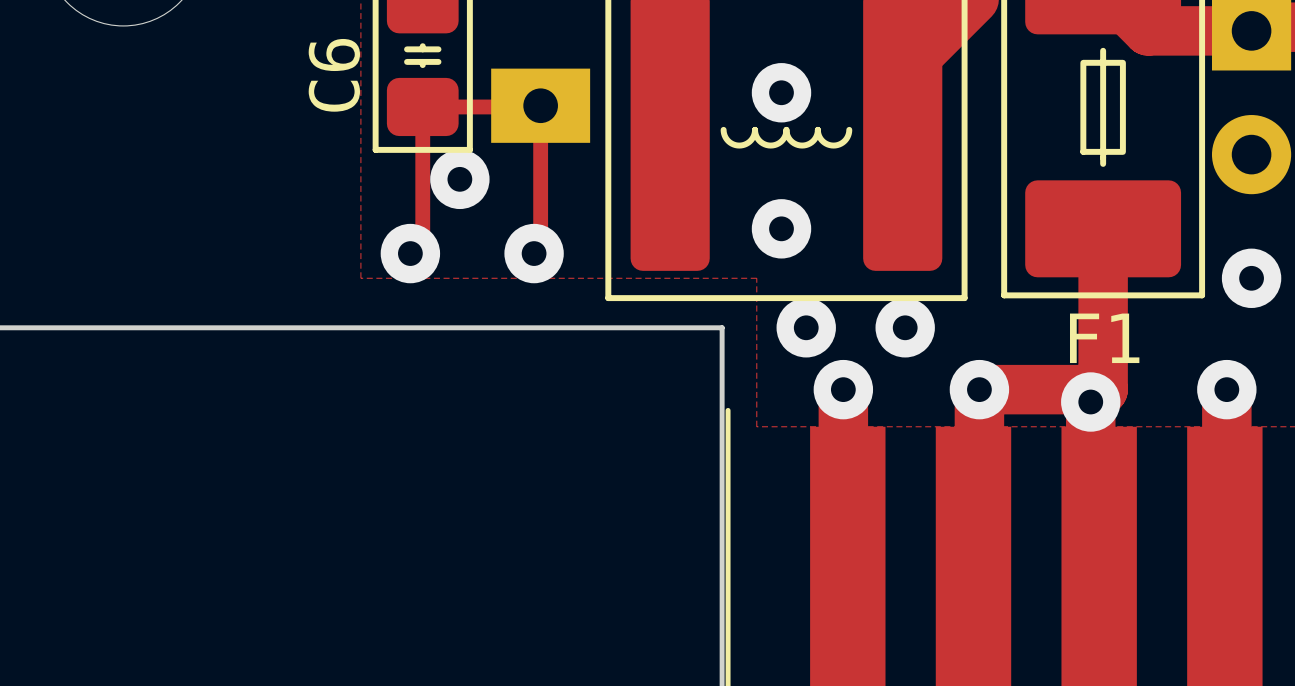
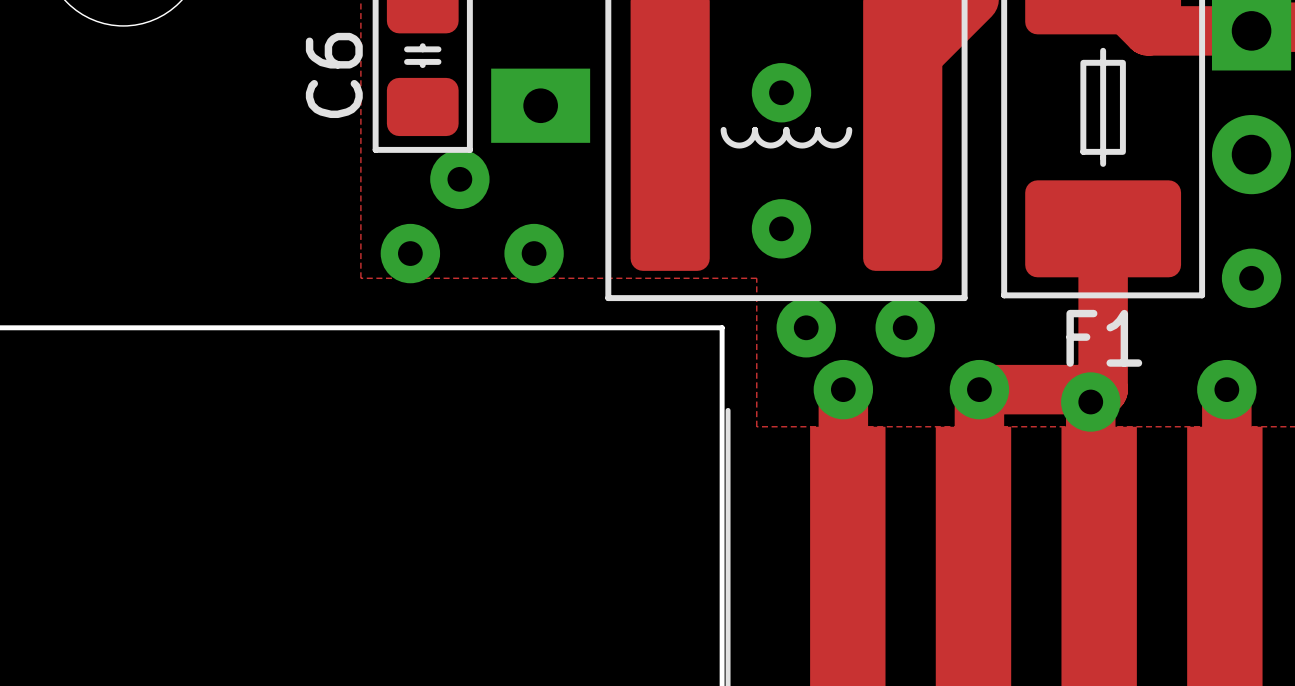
track: (410, 253) (422, 241) (422, 106) (540, 105) (540, 247) (534, 253) -> none

